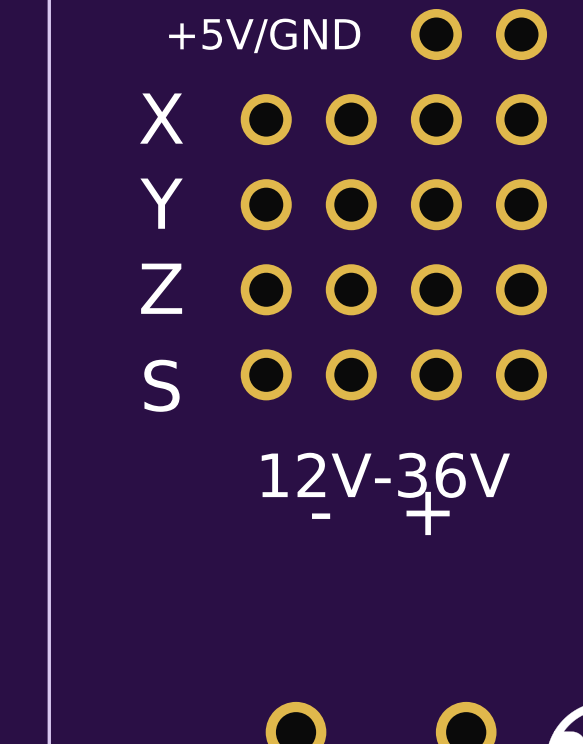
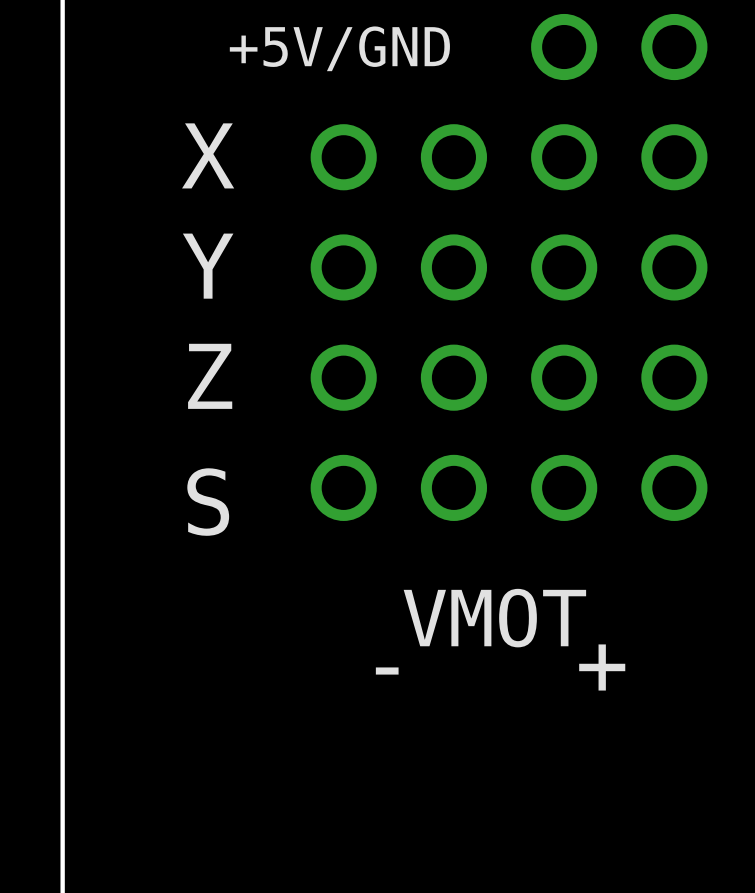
part value: 12V-36V (385, 475) -> VMOT (494, 618)

